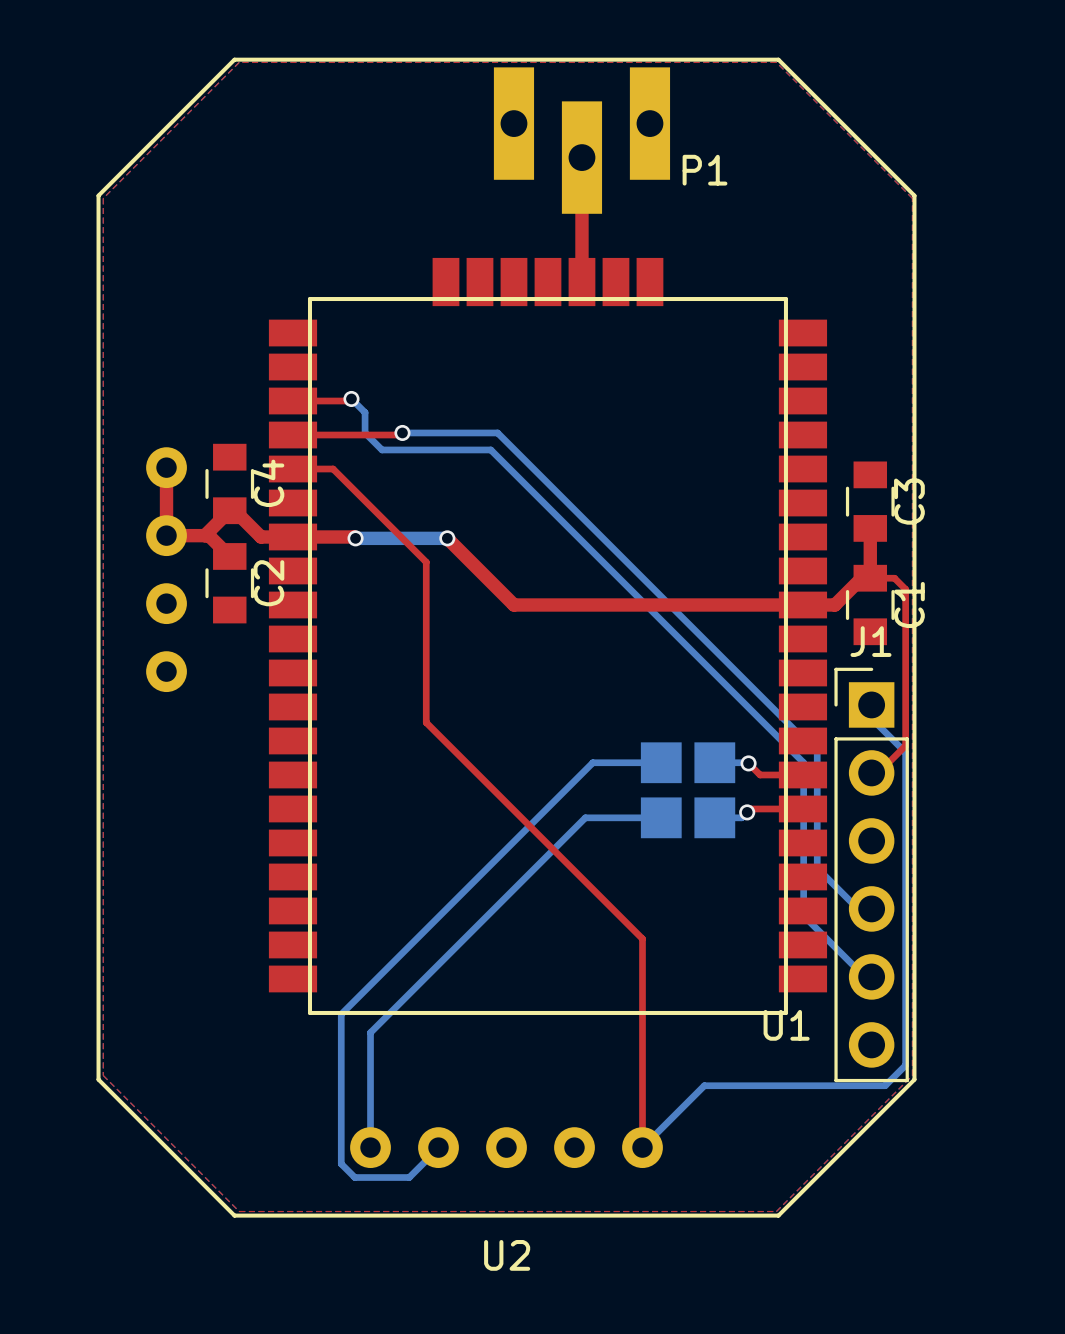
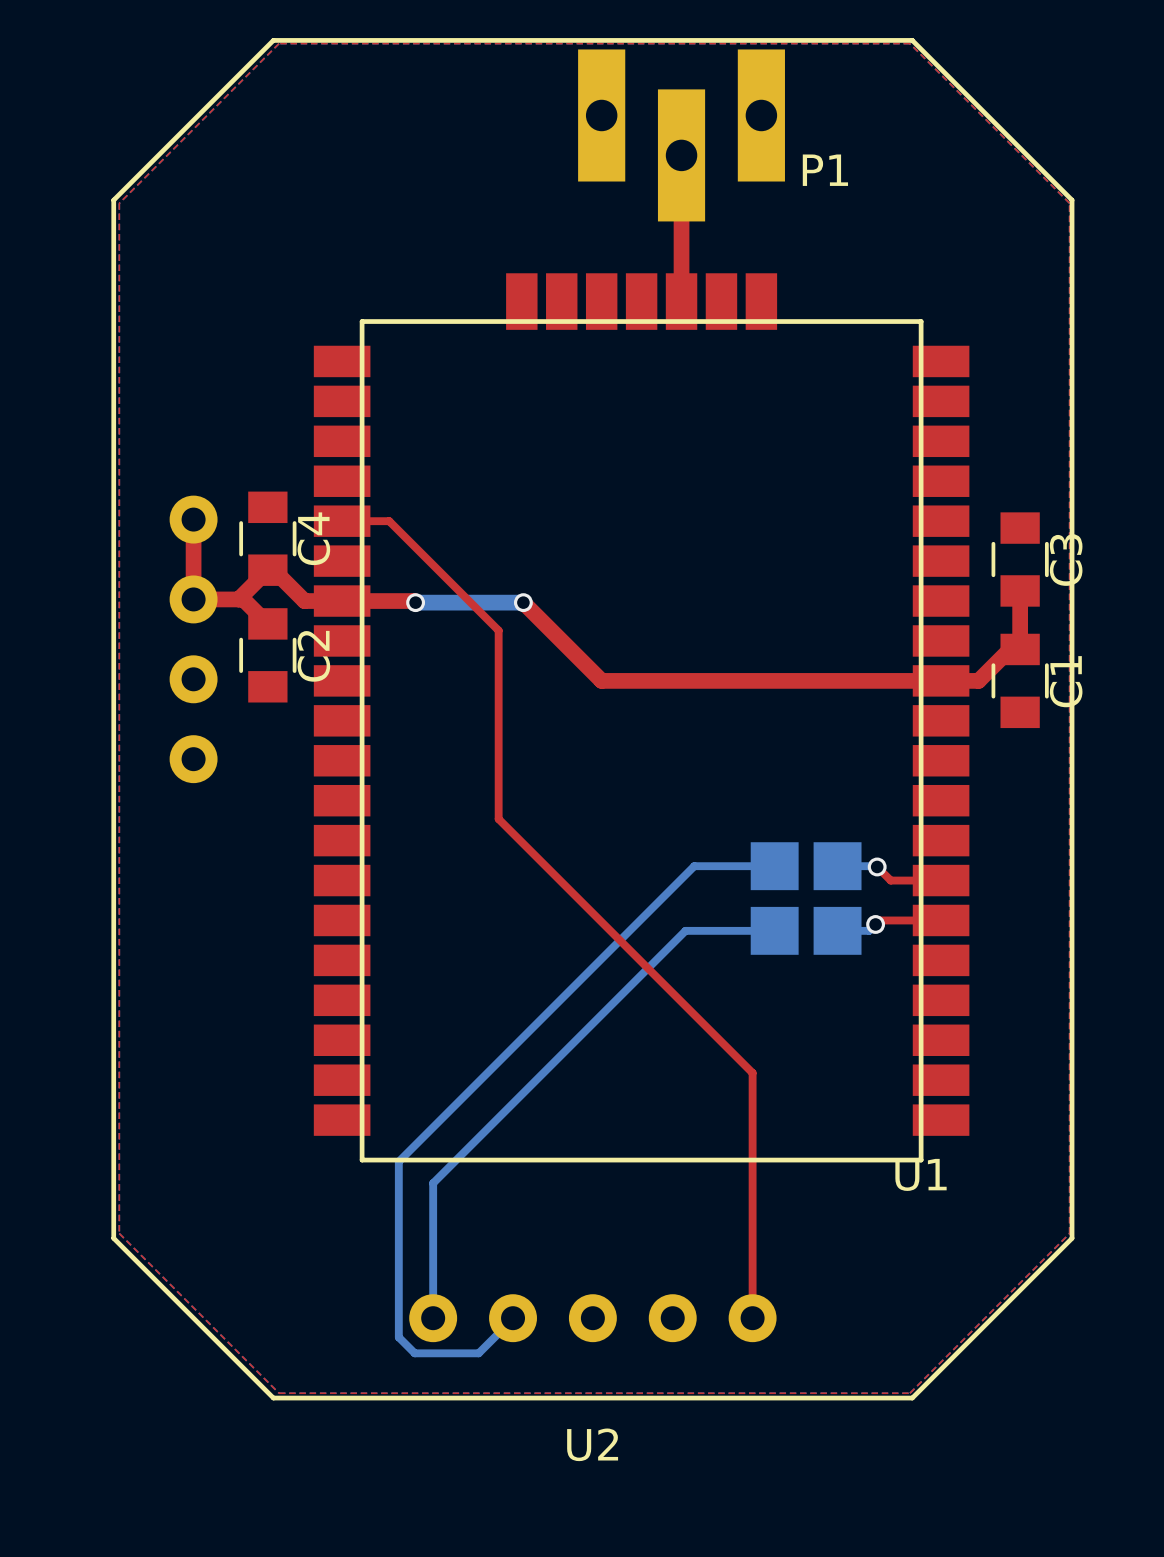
top track: (351, 398) (349, 401) (292, 401) -> none
bottom track: (351, 398) (365, 412) (365, 432) (382, 449) (490, 449) (803, 762) (803, 915) (864, 976) (871, 976) -> none
via: (351, 398) -> none
top track: (402, 432) (400, 435) (292, 435) -> none
bottom track: (402, 432) (497, 432) (817, 752) (817, 868) (858, 908) (871, 908) -> none
via: (402, 432) -> none
top track: (870, 574) (870, 578) (894, 578) (905, 589) (905, 745) (878, 772) (871, 772) -> none
bottom track: (871, 704) (871, 718) (905, 752) (905, 1065) (885, 1085) (704, 1085) (642, 1147) -> none
J1: (871, 874) -> none

